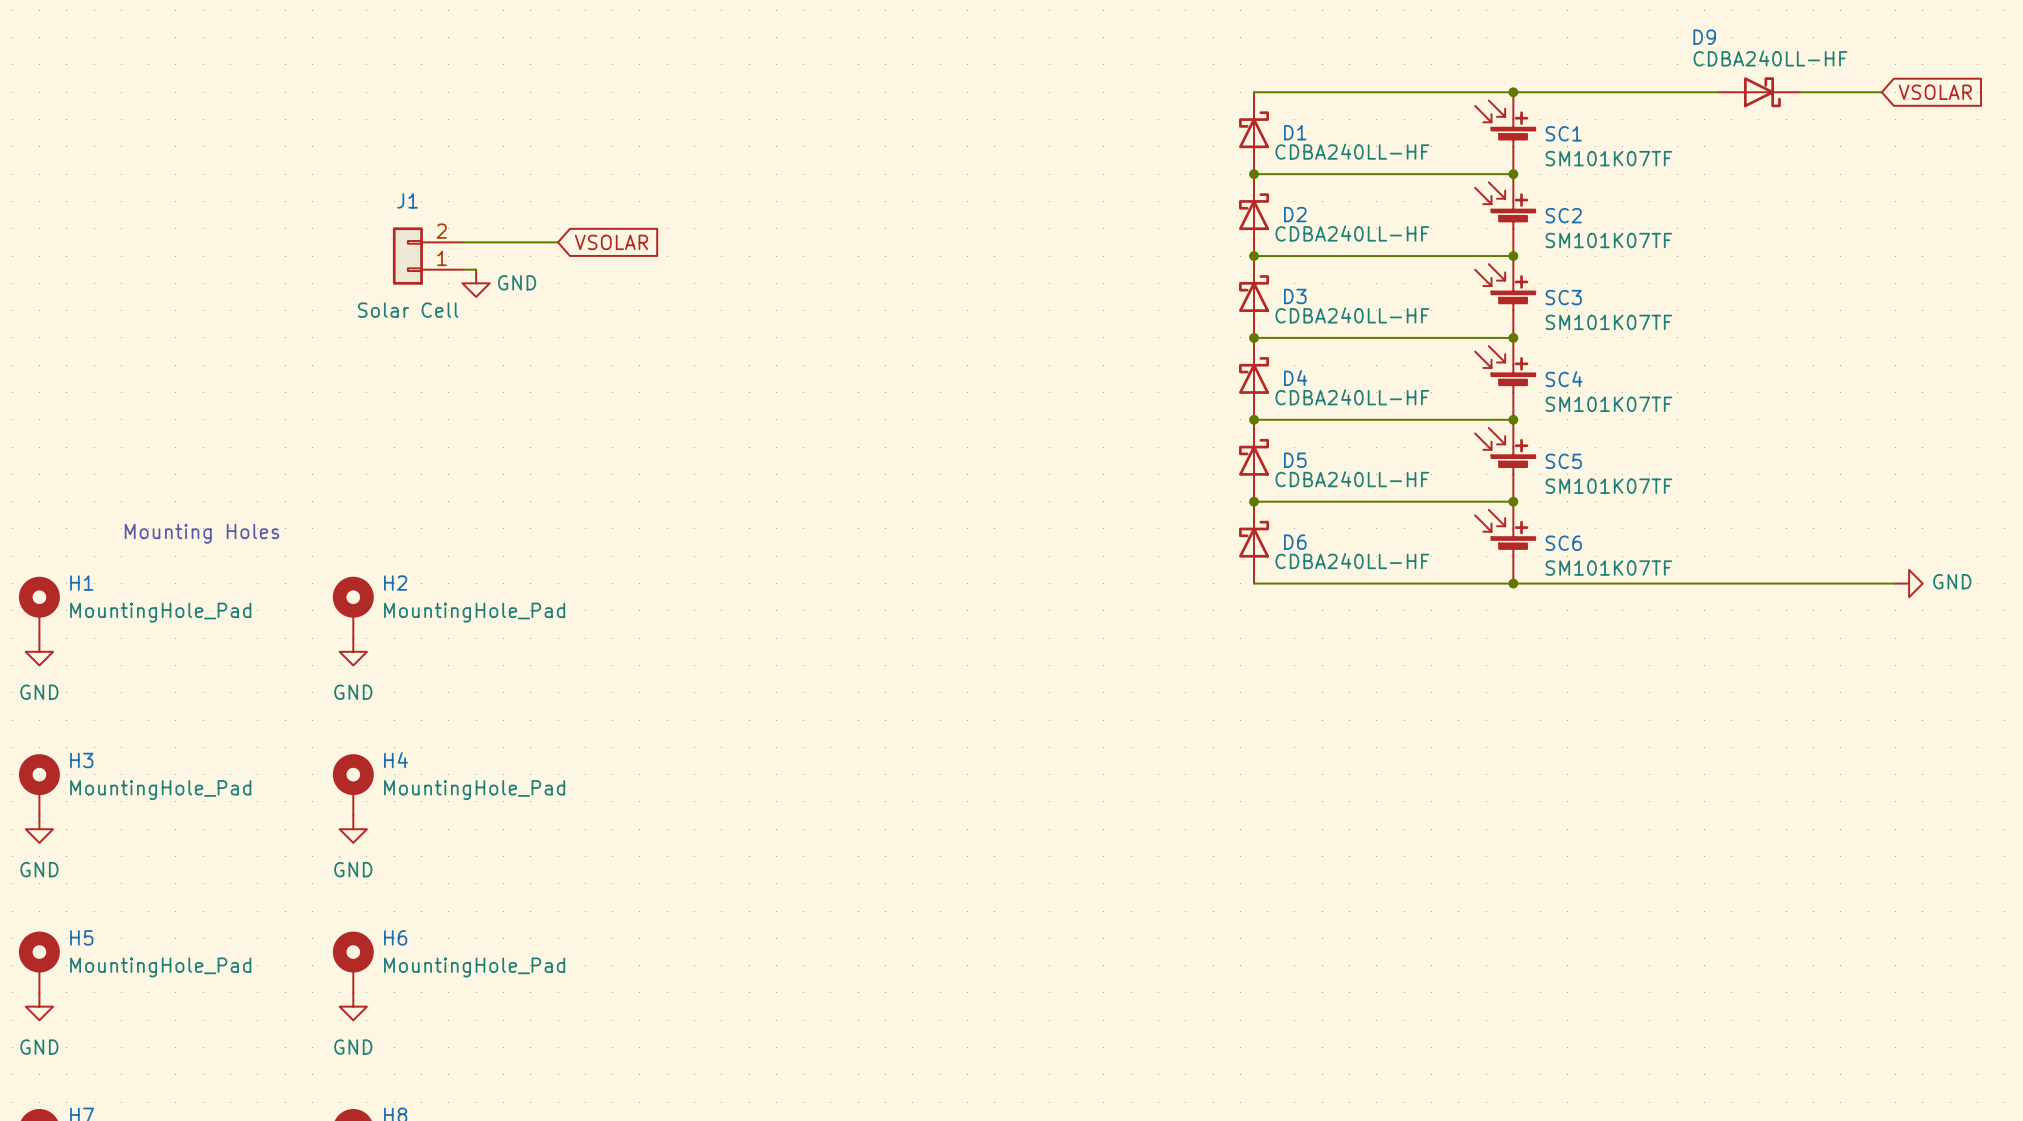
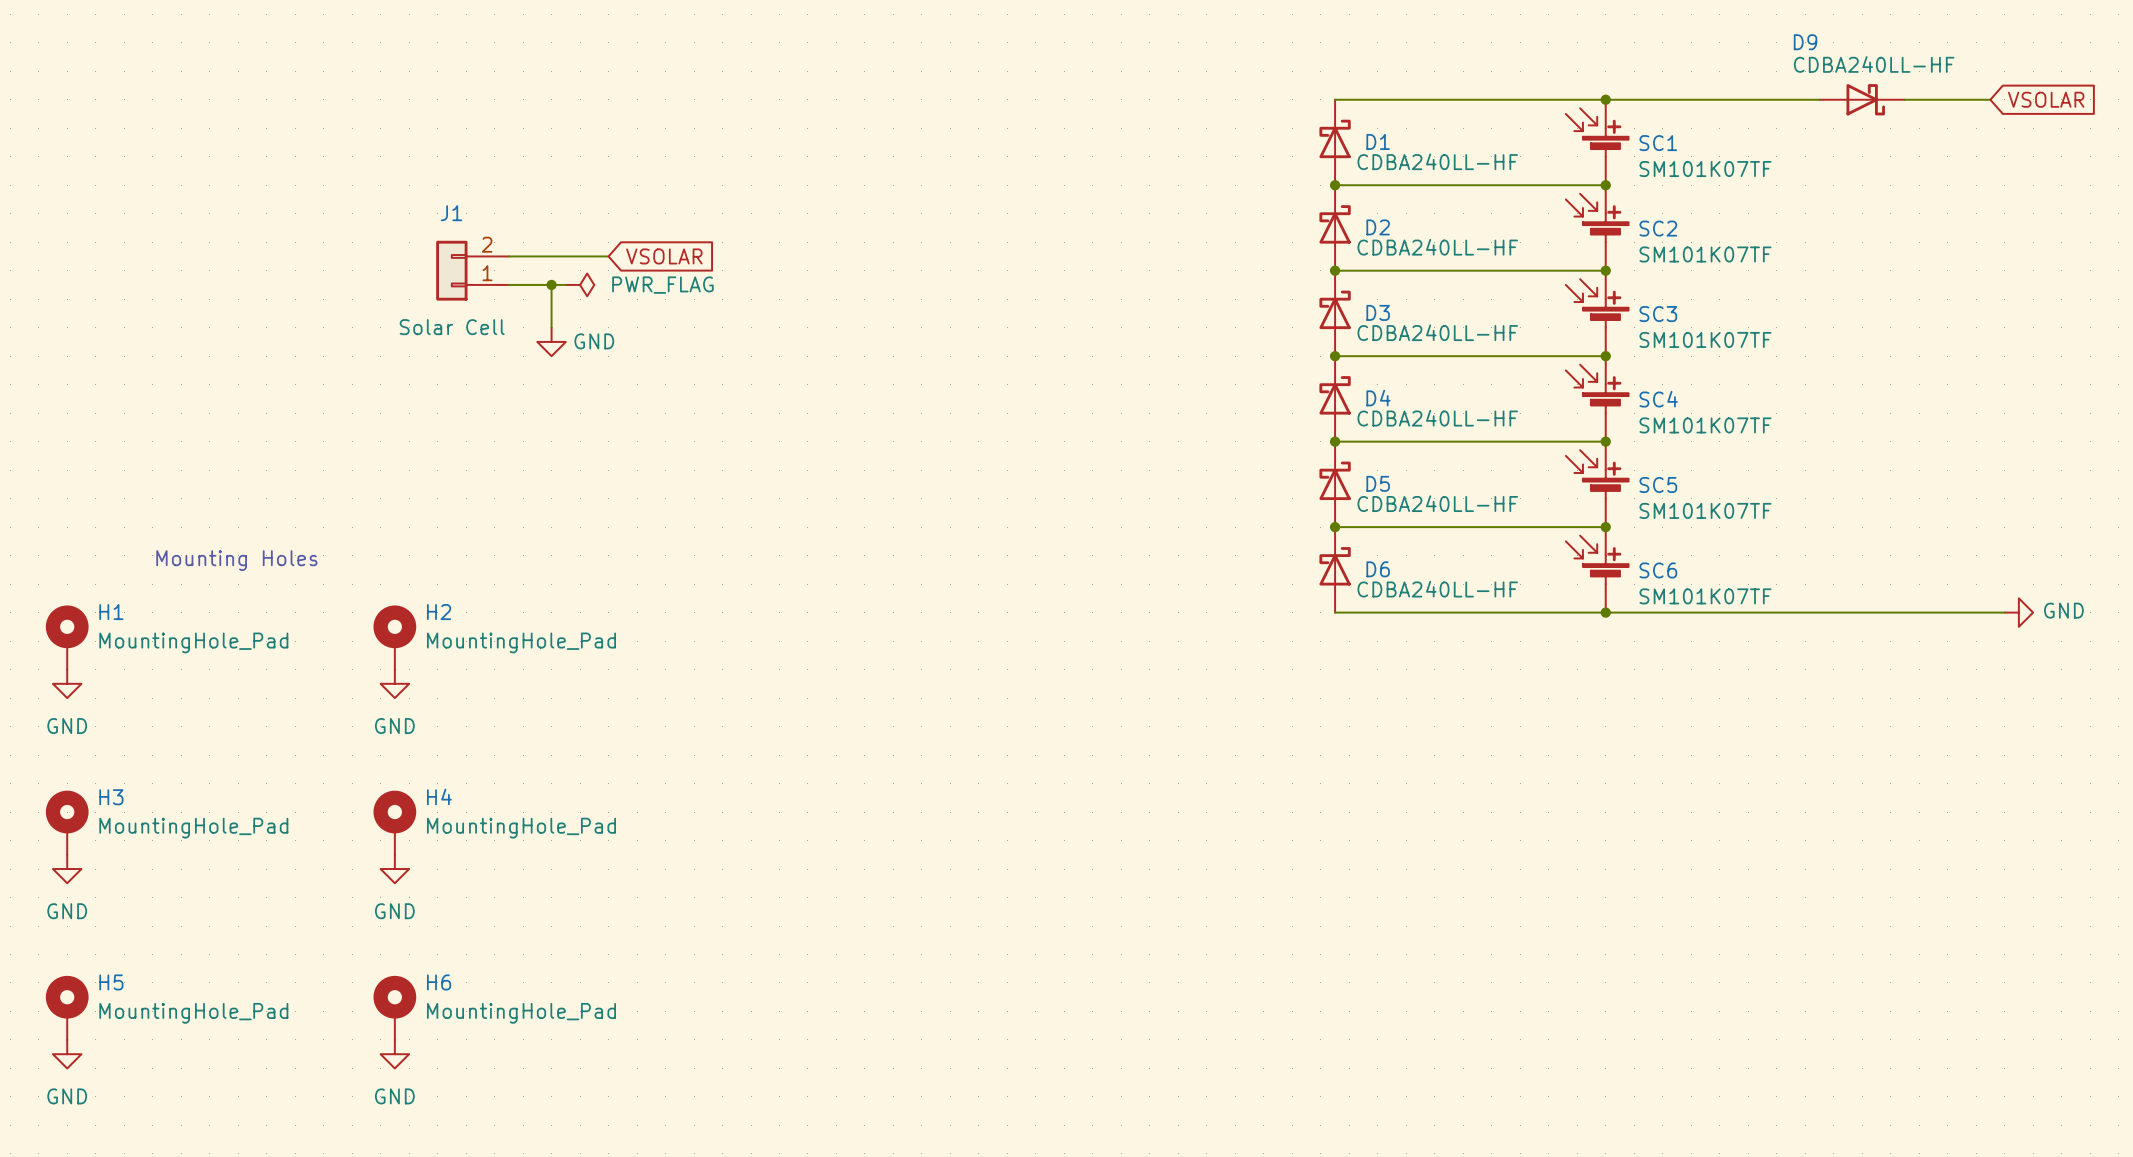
wire: none -> (523, 284) (565, 284)
wire: none -> (551, 284) (551, 327)
junction: none -> (551, 284)
power symbol: none -> PWR_FLAG (580, 284)
power symbol position: GND (476, 283) -> GND (551, 341)

